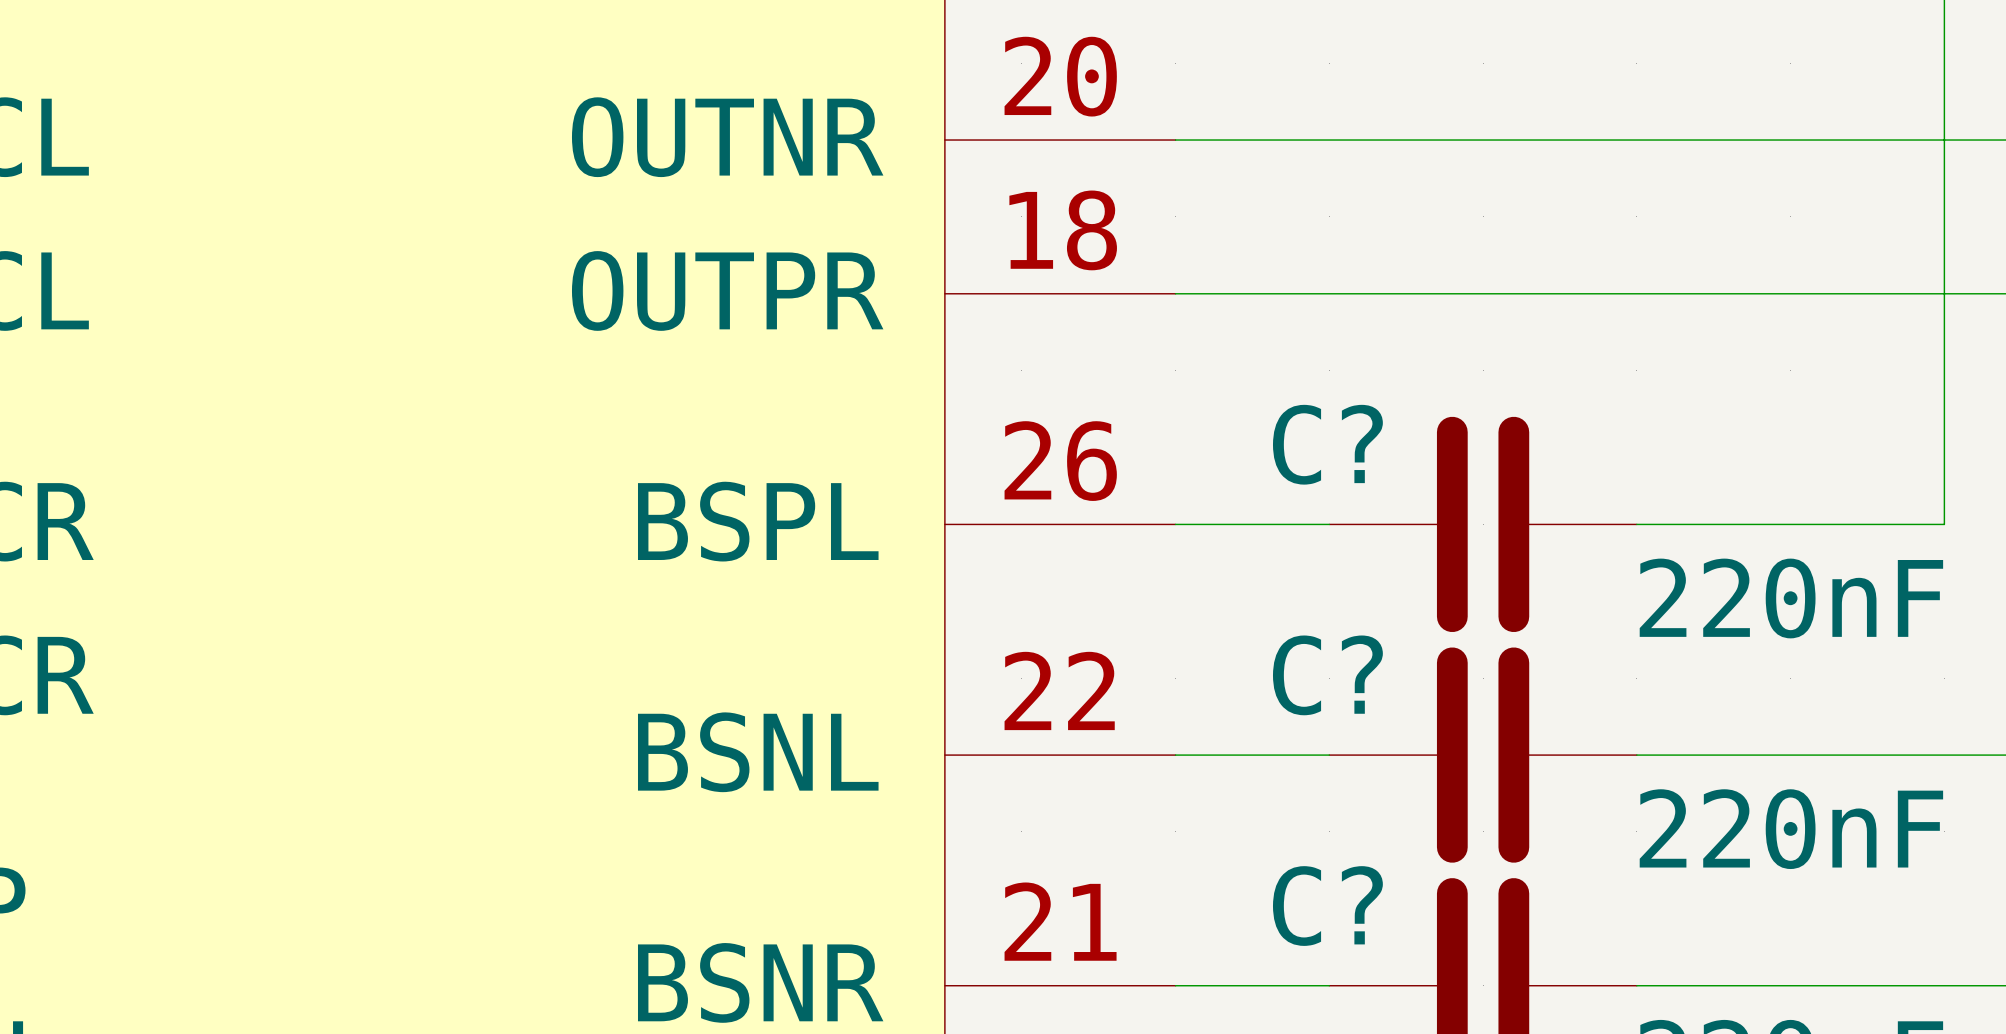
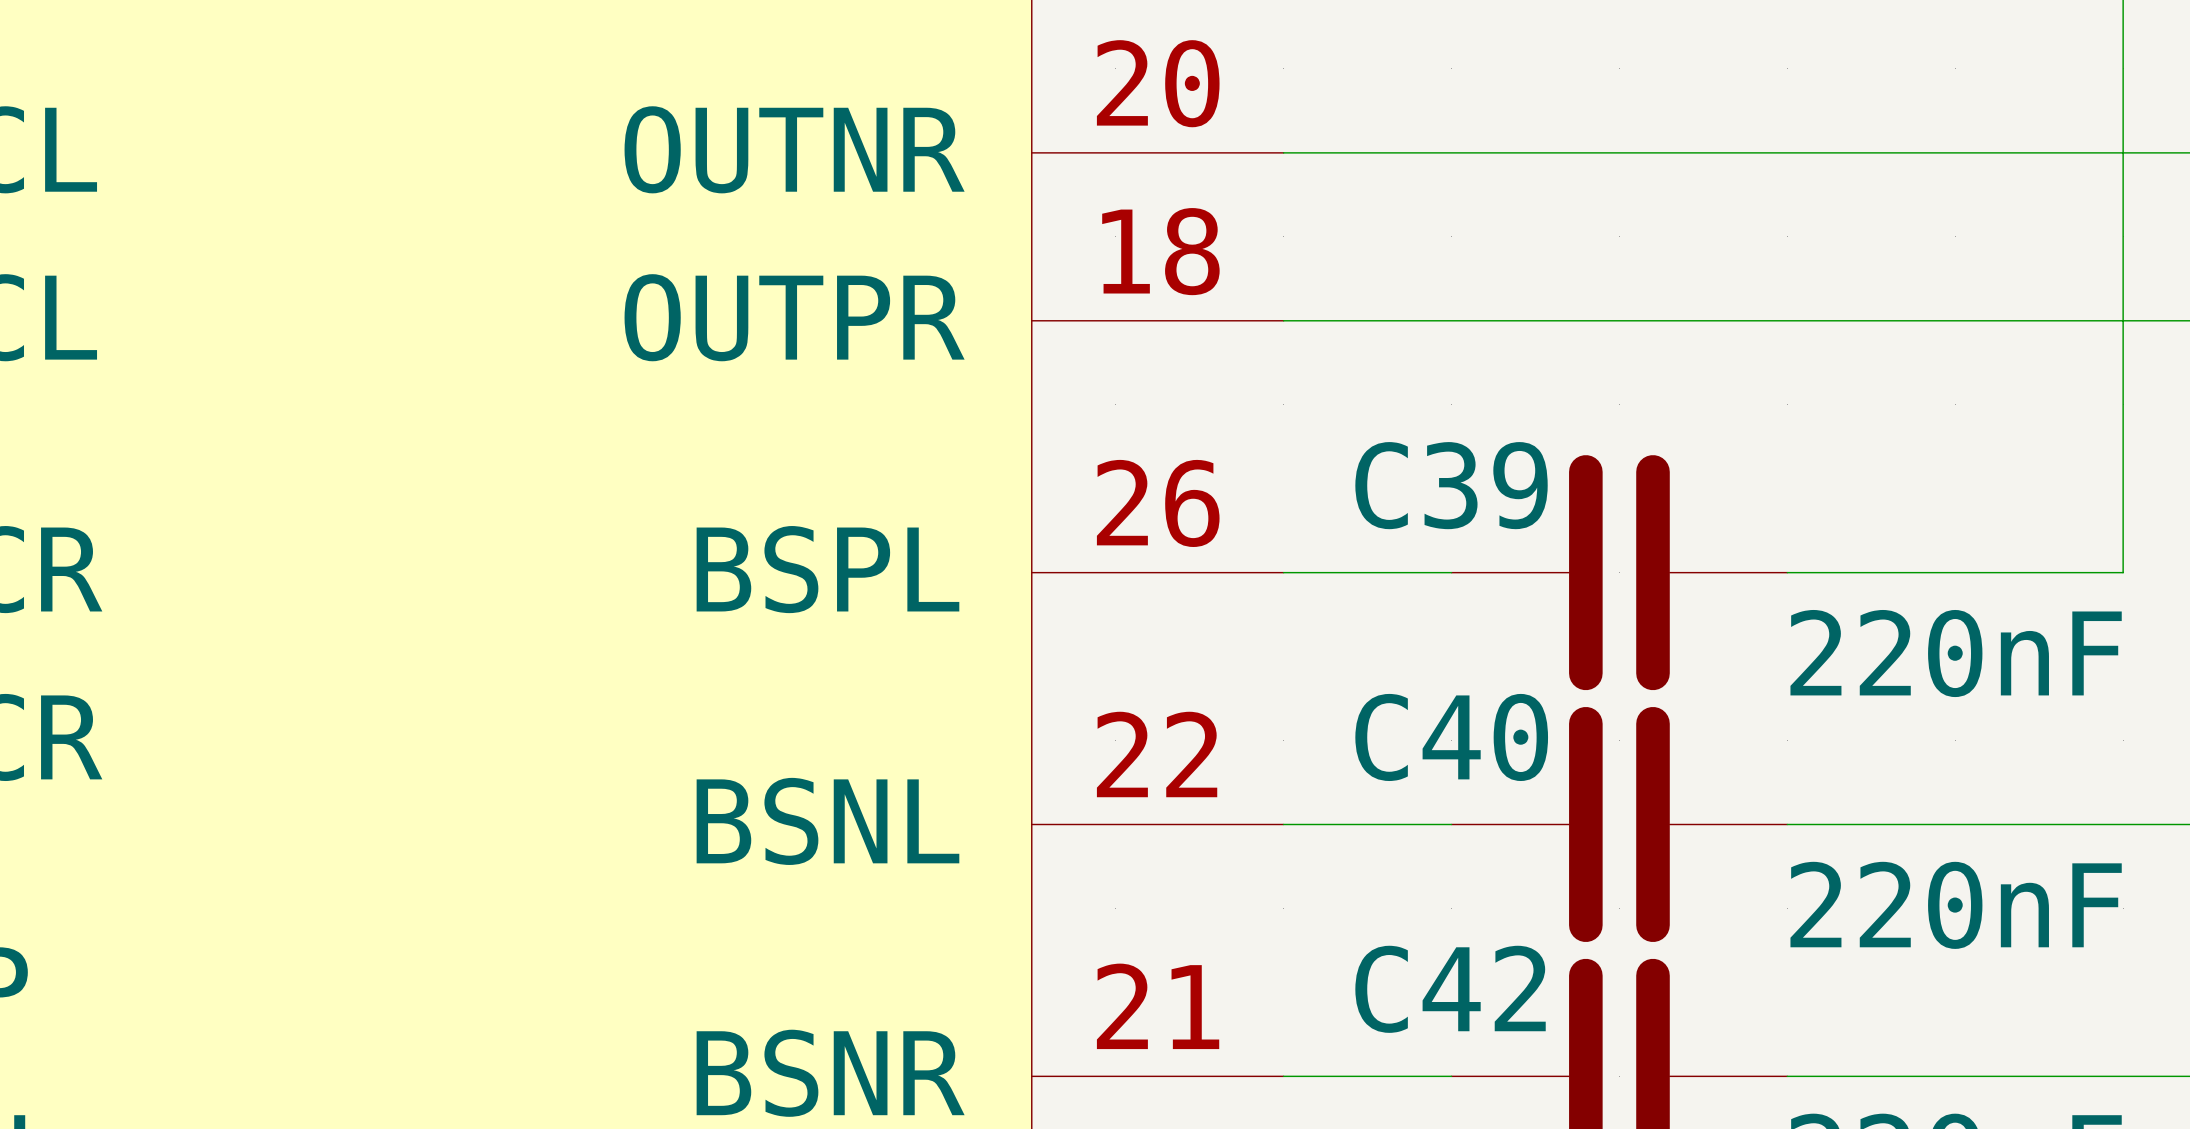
C? name: C? (1327, 444) -> C39 (1451, 485)
C? name: C? (1327, 675) -> C40 (1451, 737)
C? name: C? (1327, 906) -> C42 (1450, 989)

